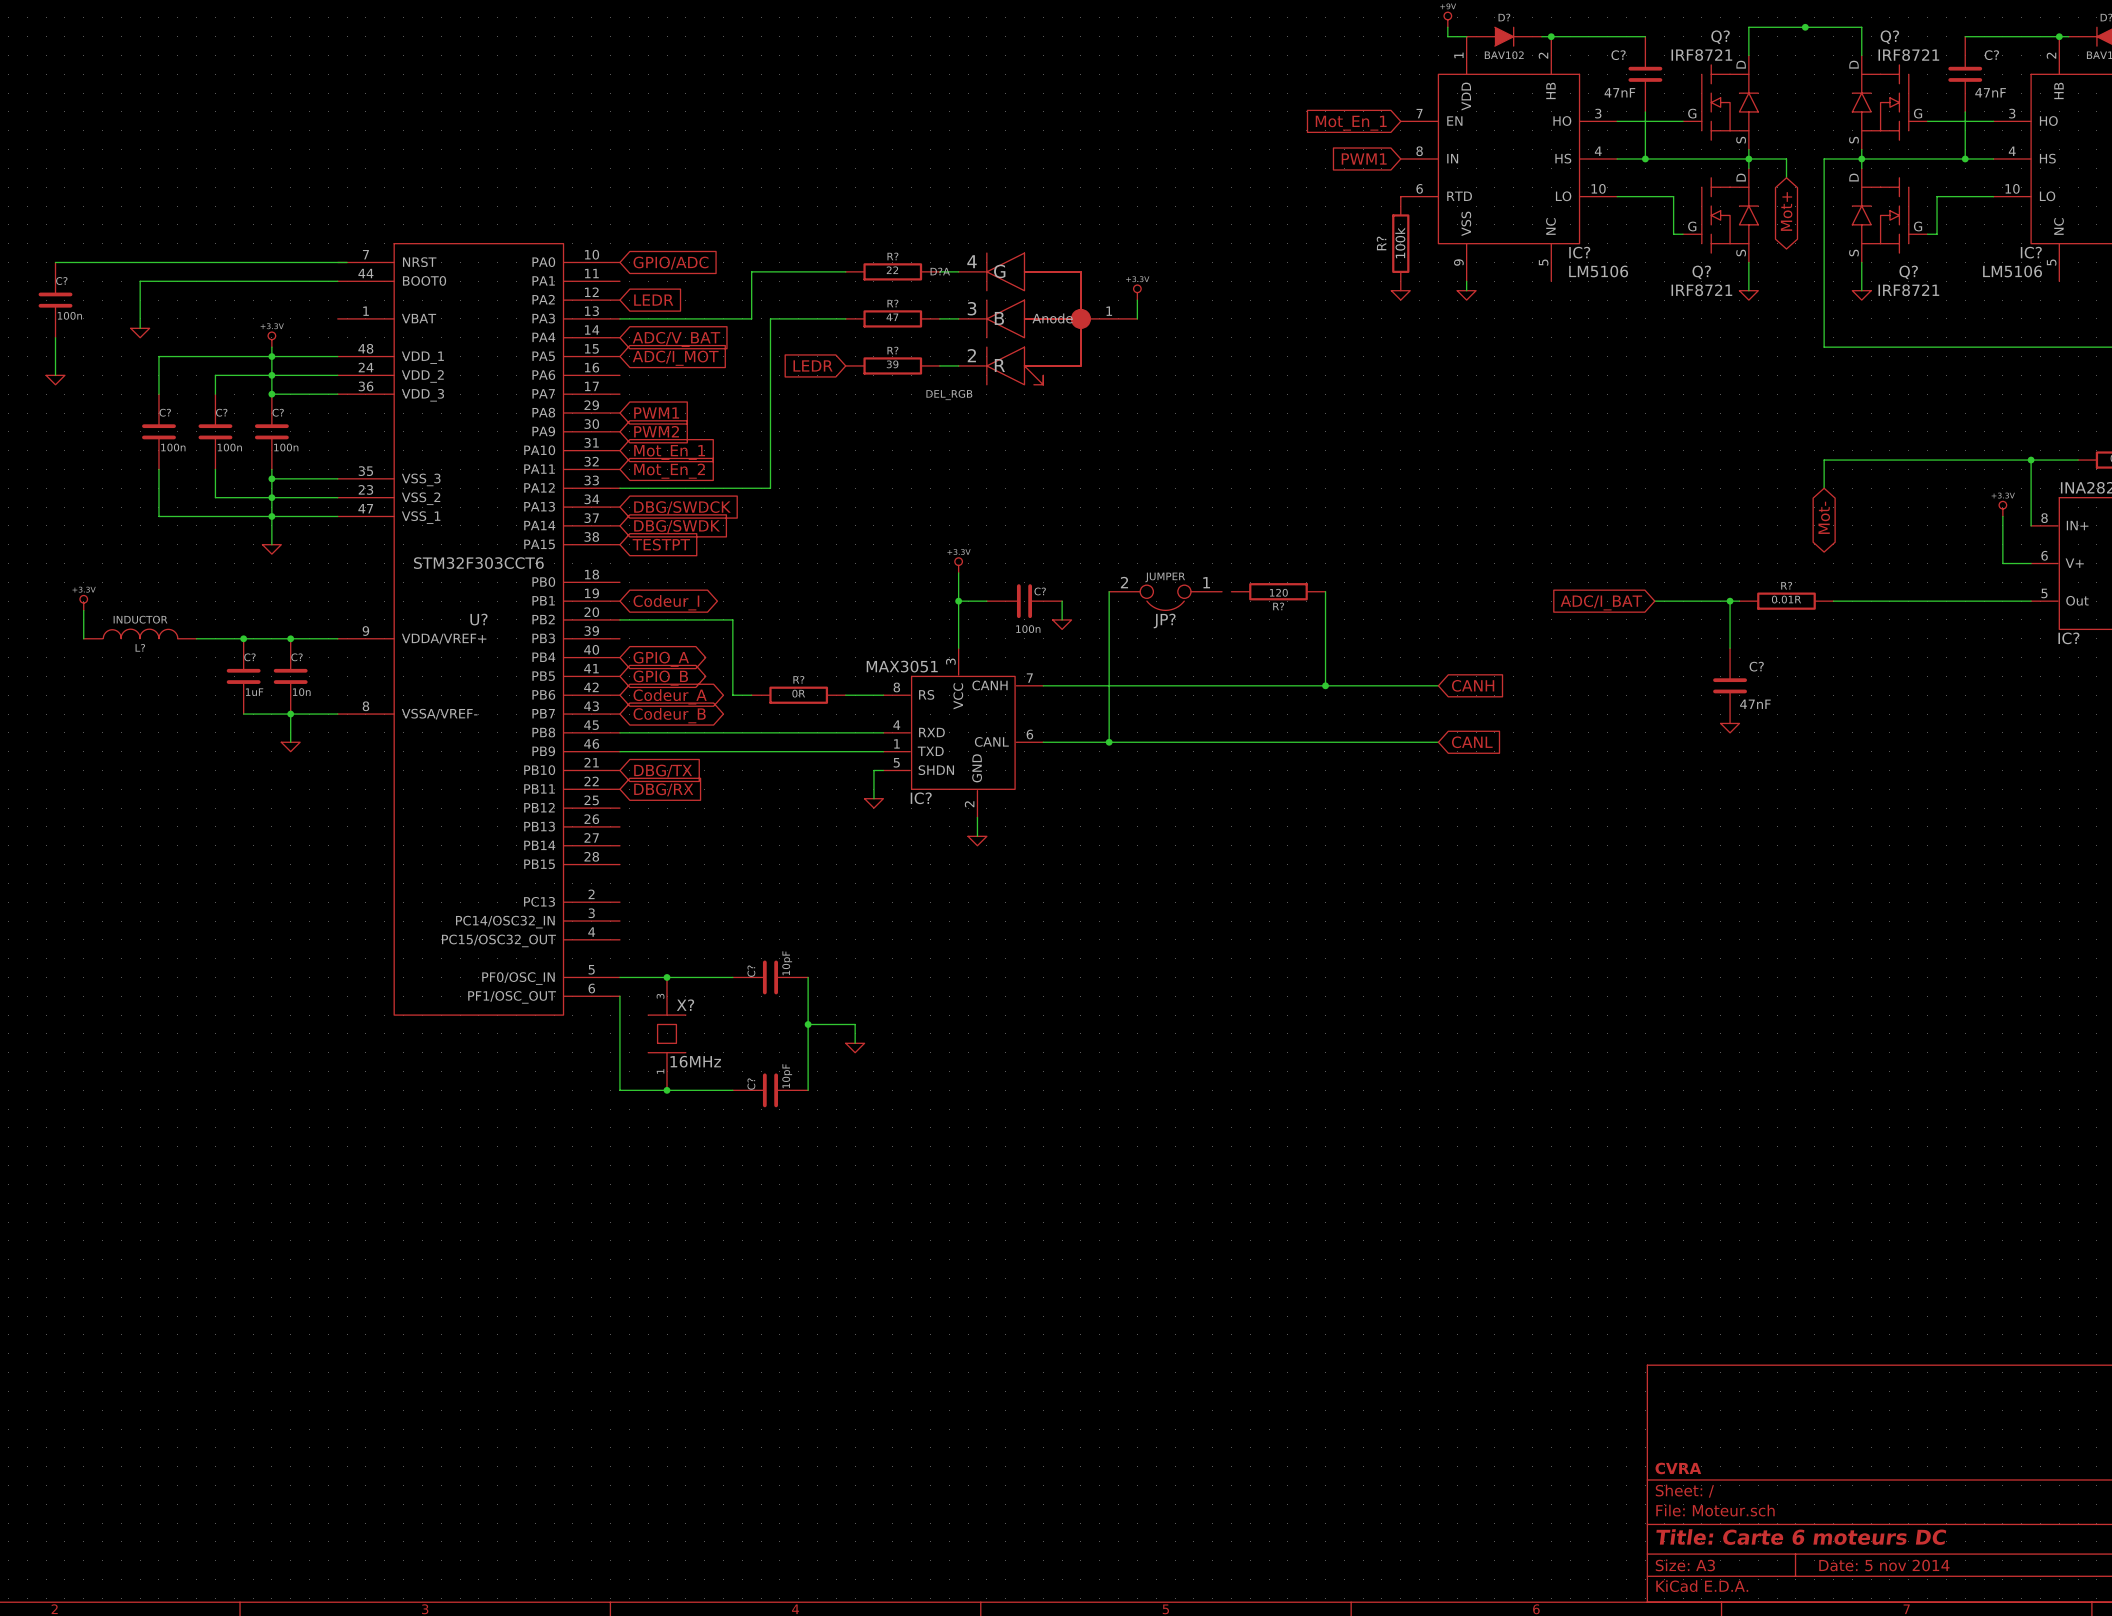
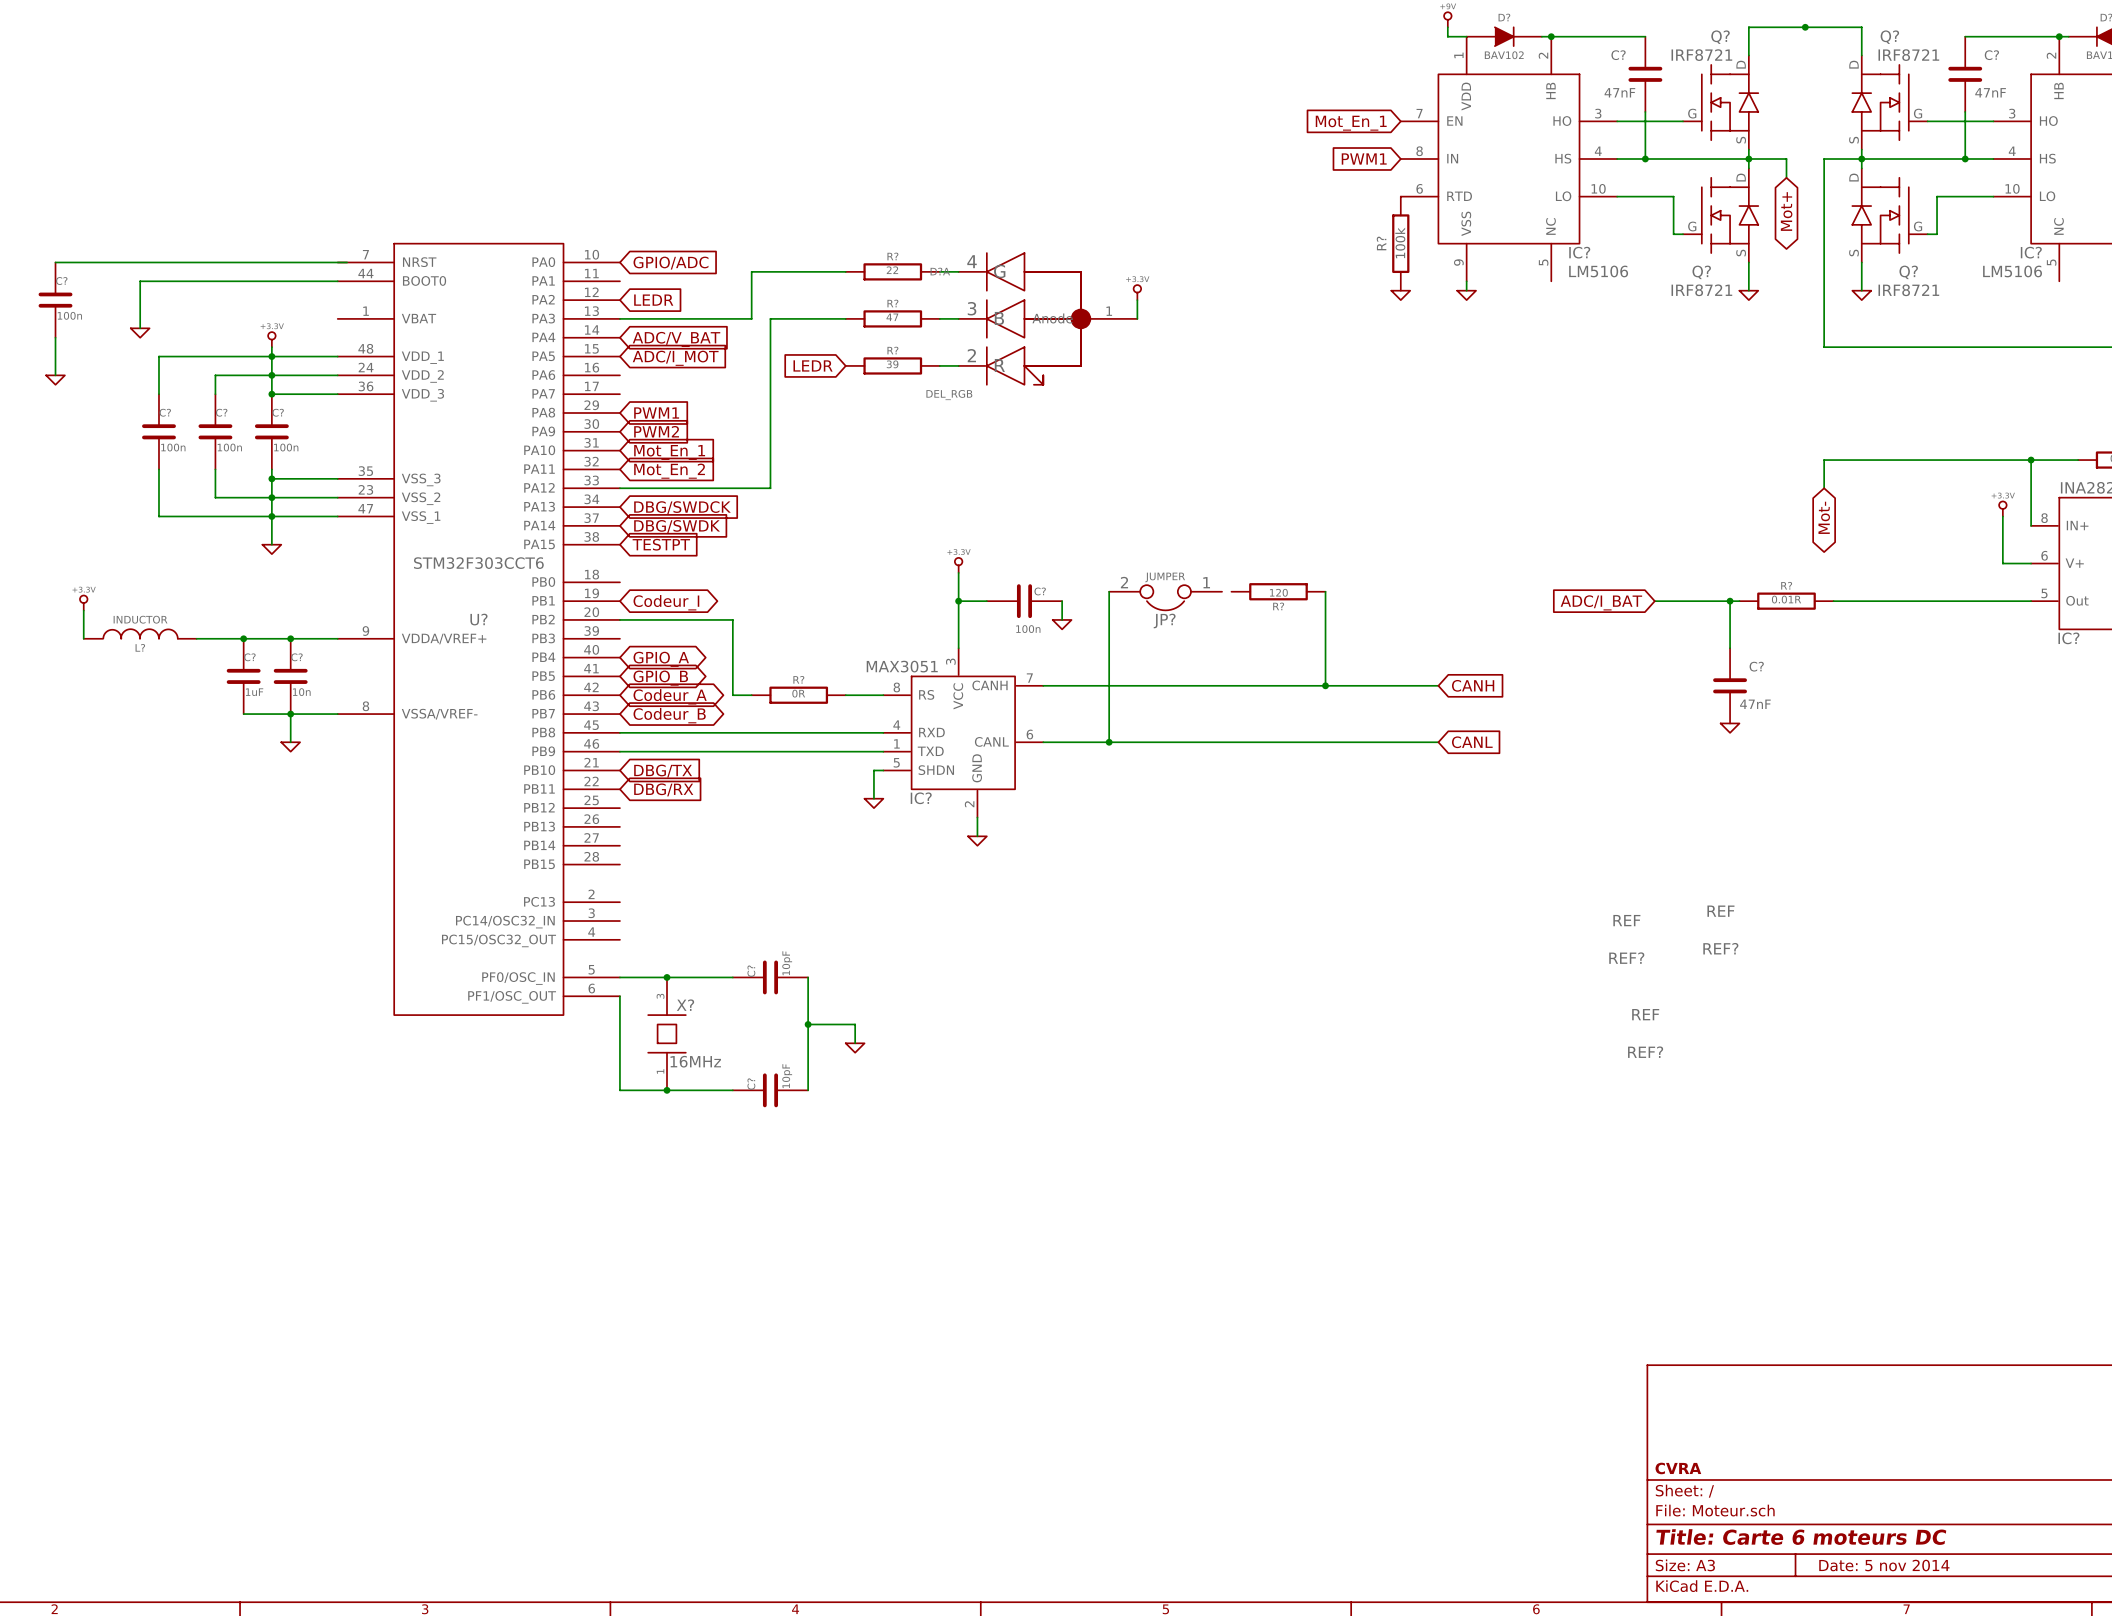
REF?: none -> REF (1720, 930)
REF?: none -> REF (1626, 939)
REF?: none -> REF (1645, 1033)

